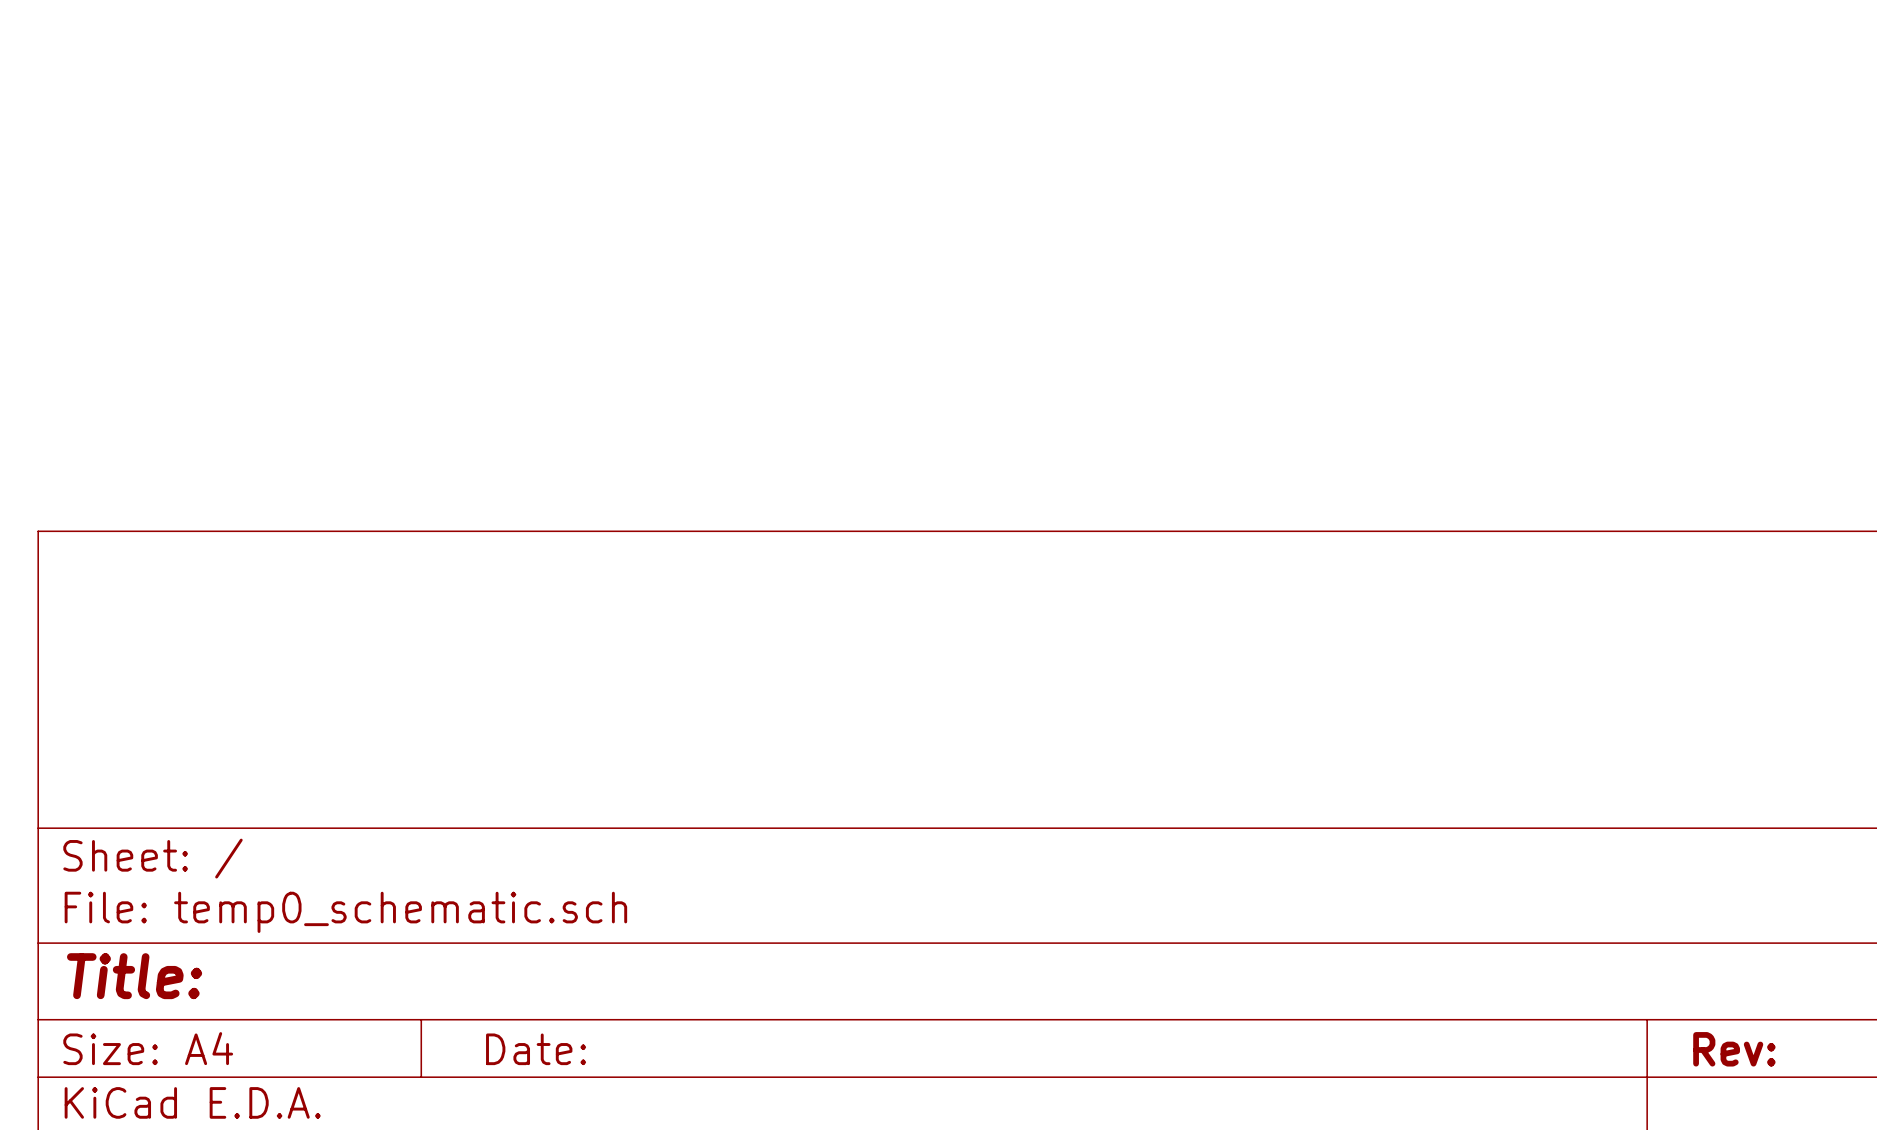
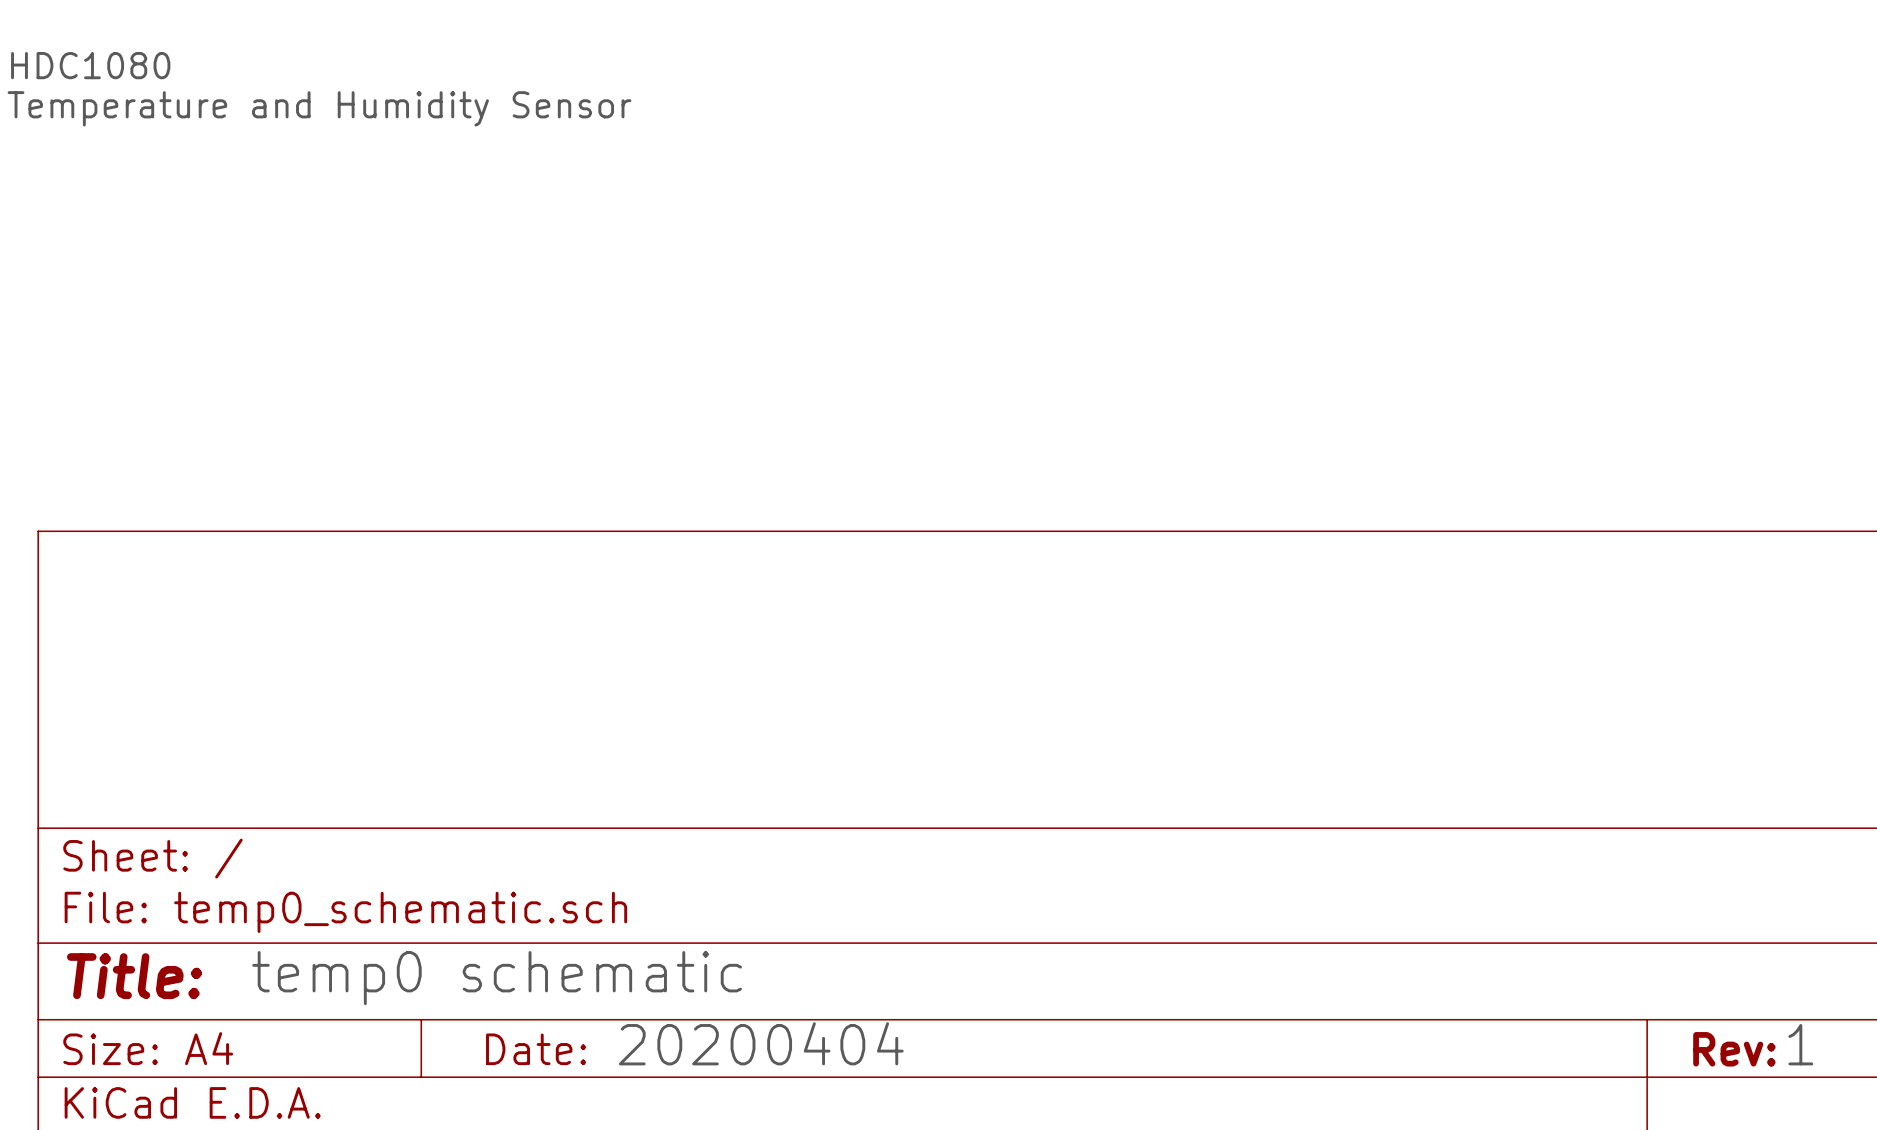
text: none -> HDC1080 (90, 65)
text: none -> Temperature and Humidity Sensor (319, 108)
text: none -> temp0 schematic (497, 978)
text: none -> 20200404 (761, 1043)
text: none -> 1 (1800, 1044)

